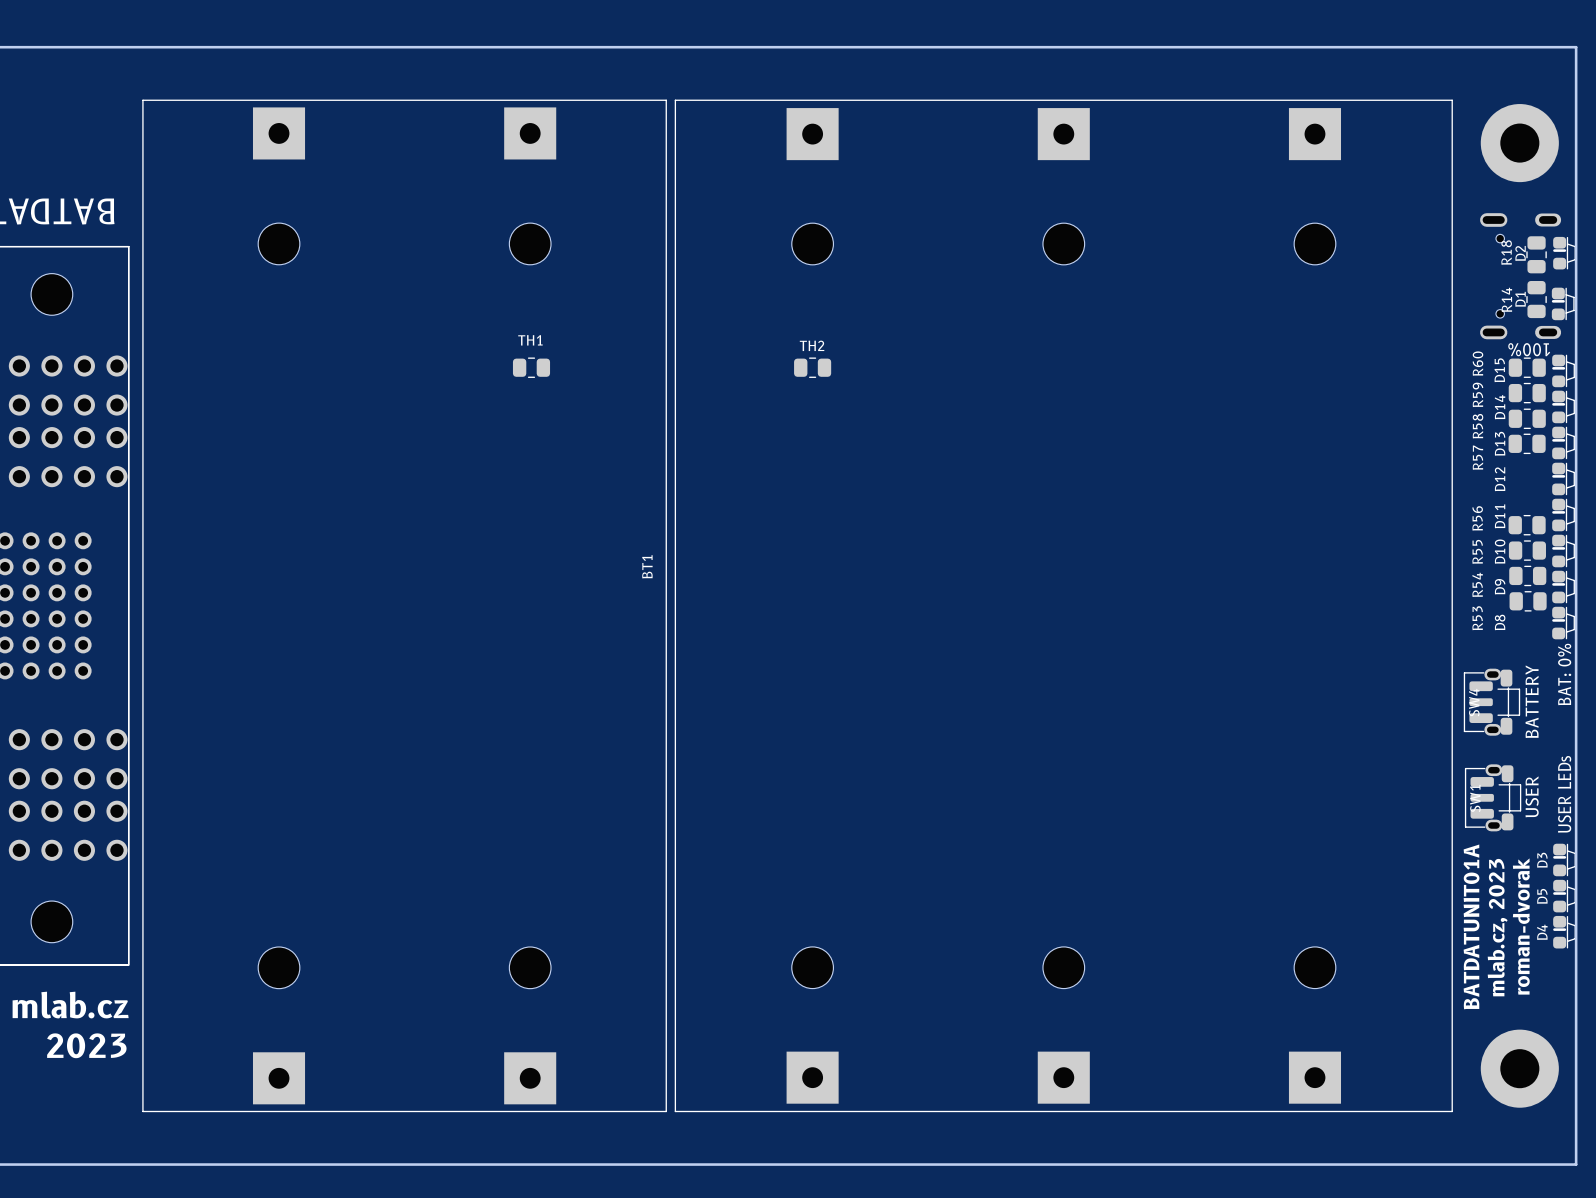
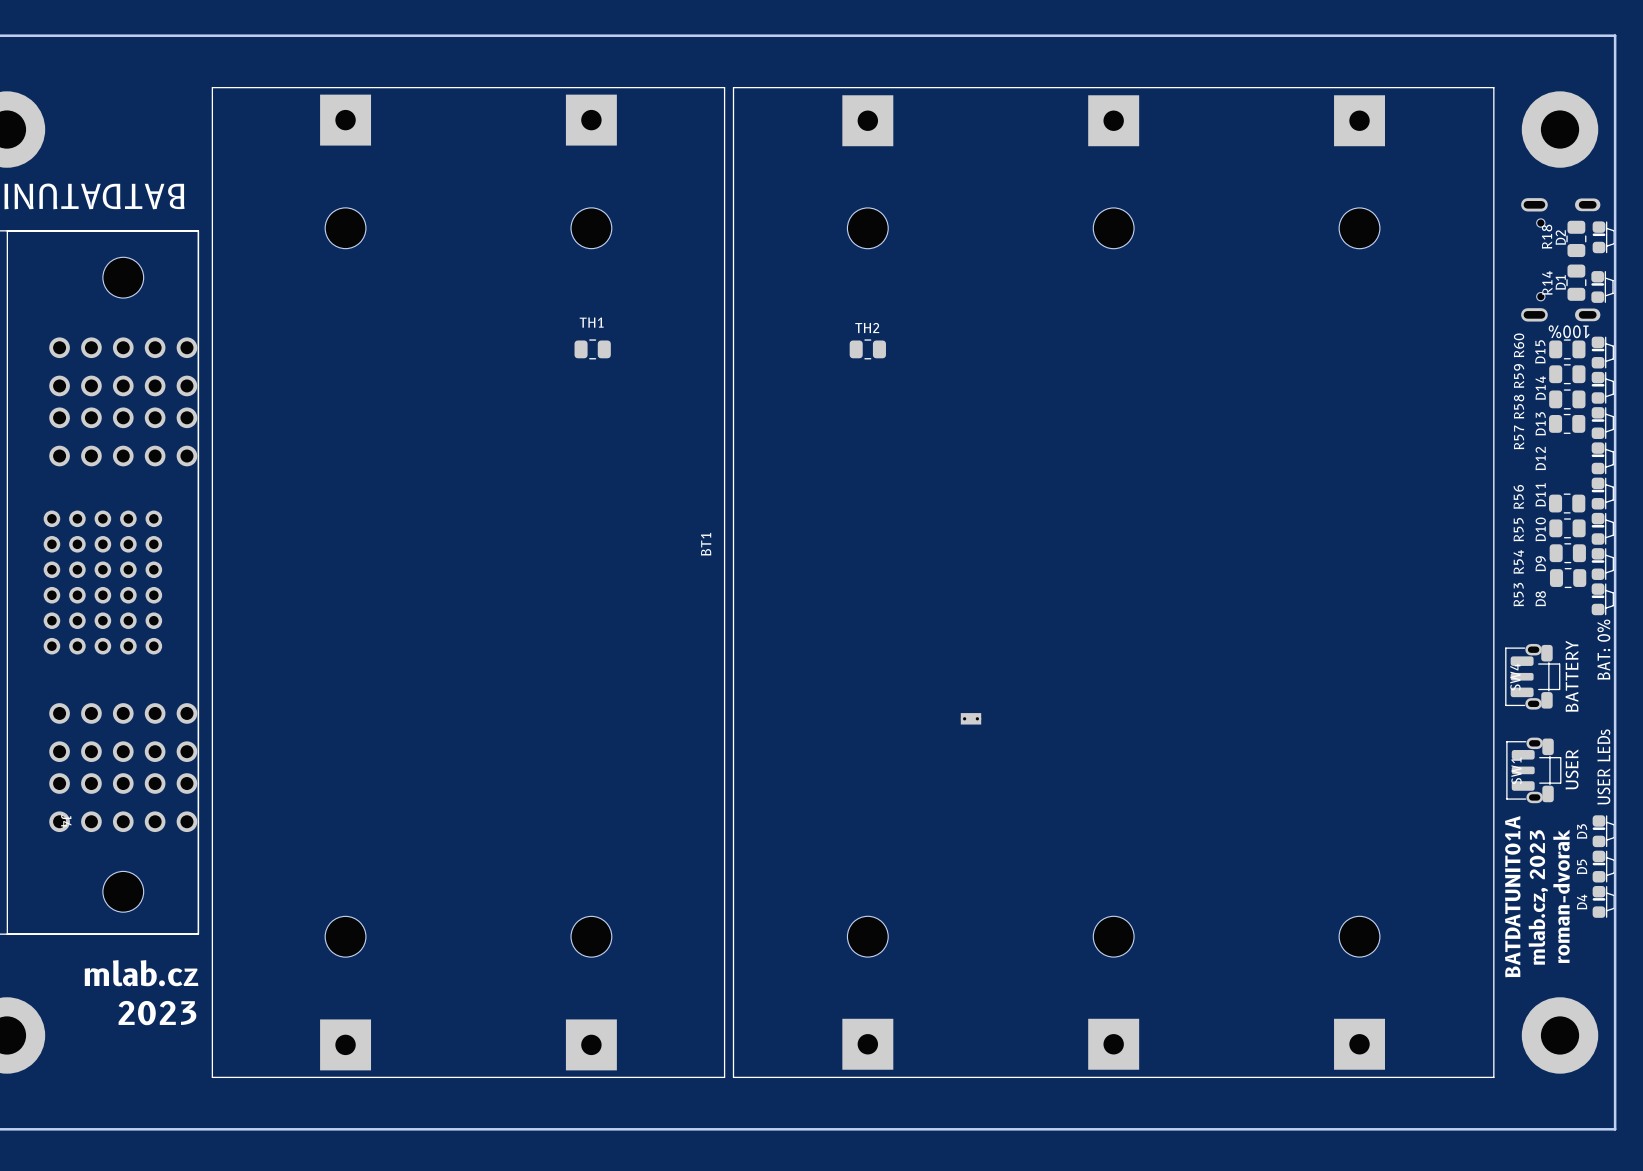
part: none -> (971, 718)

